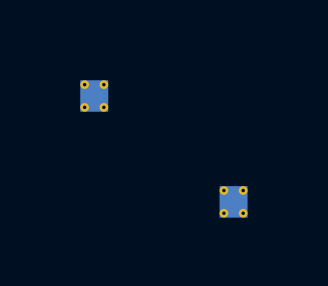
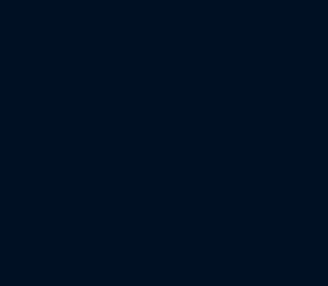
part: (94, 96) -> none
part: (233, 201) -> none

